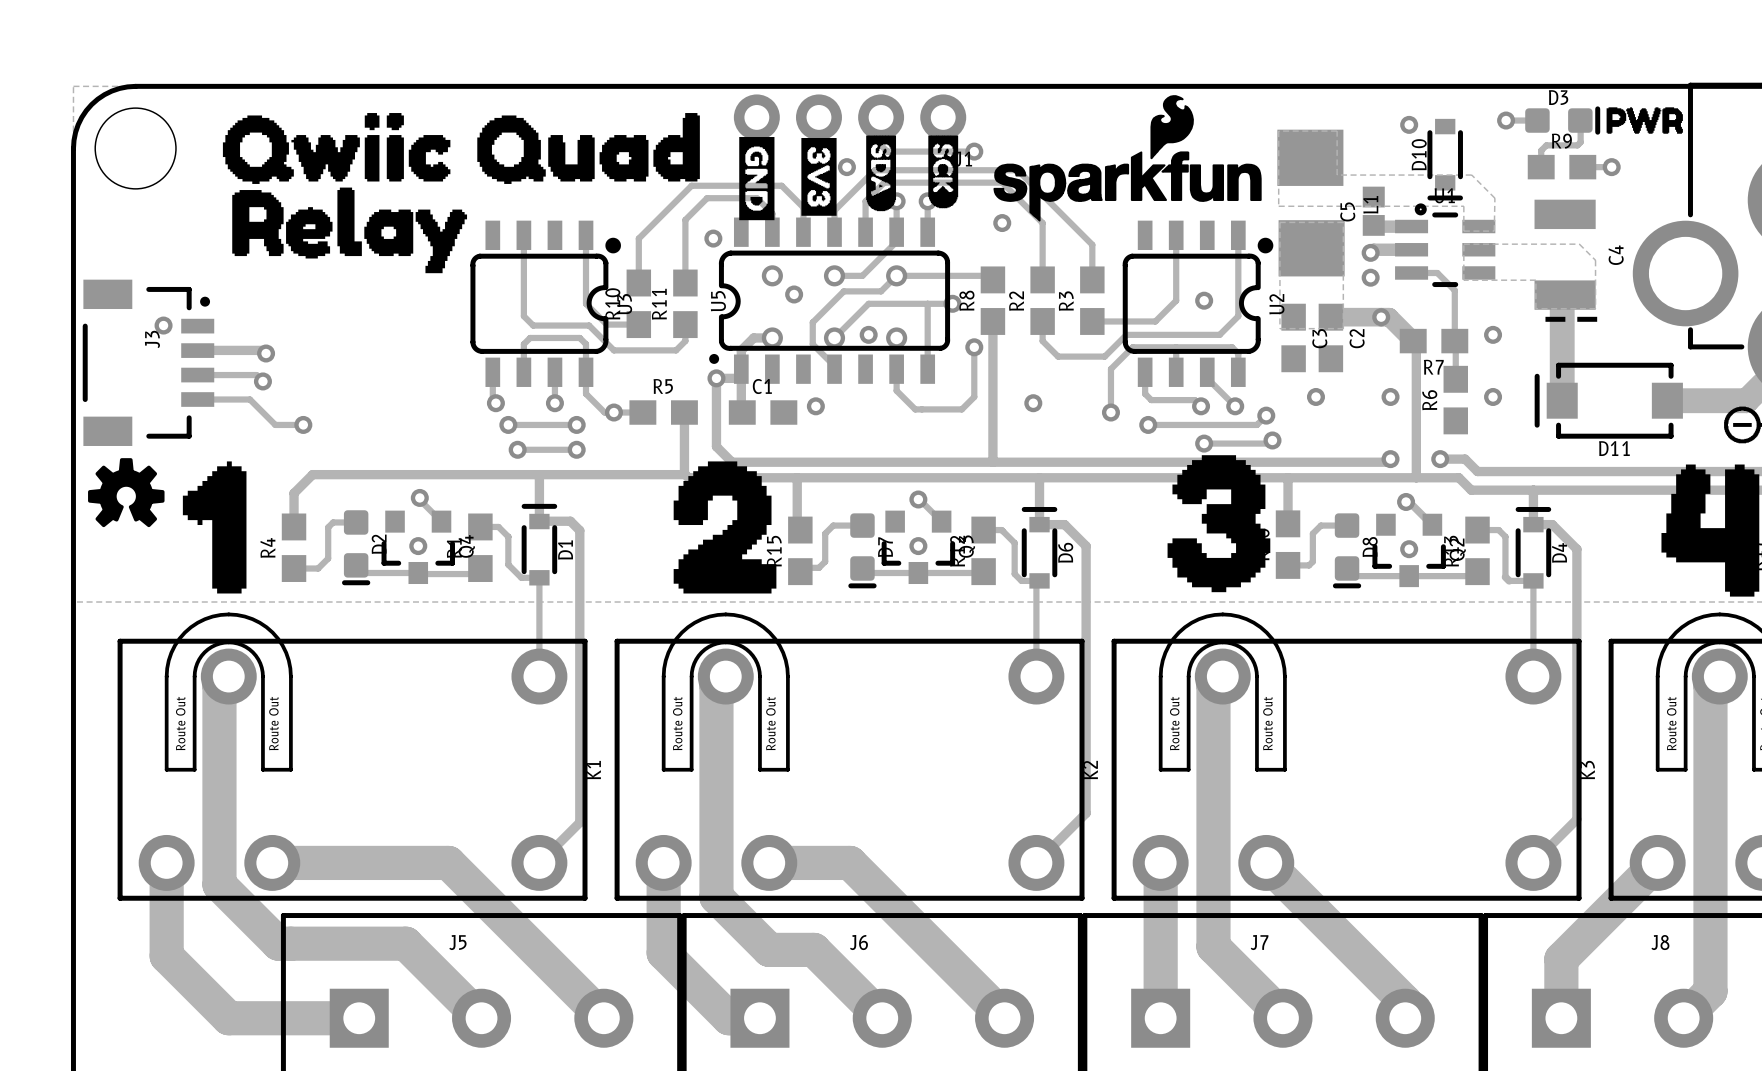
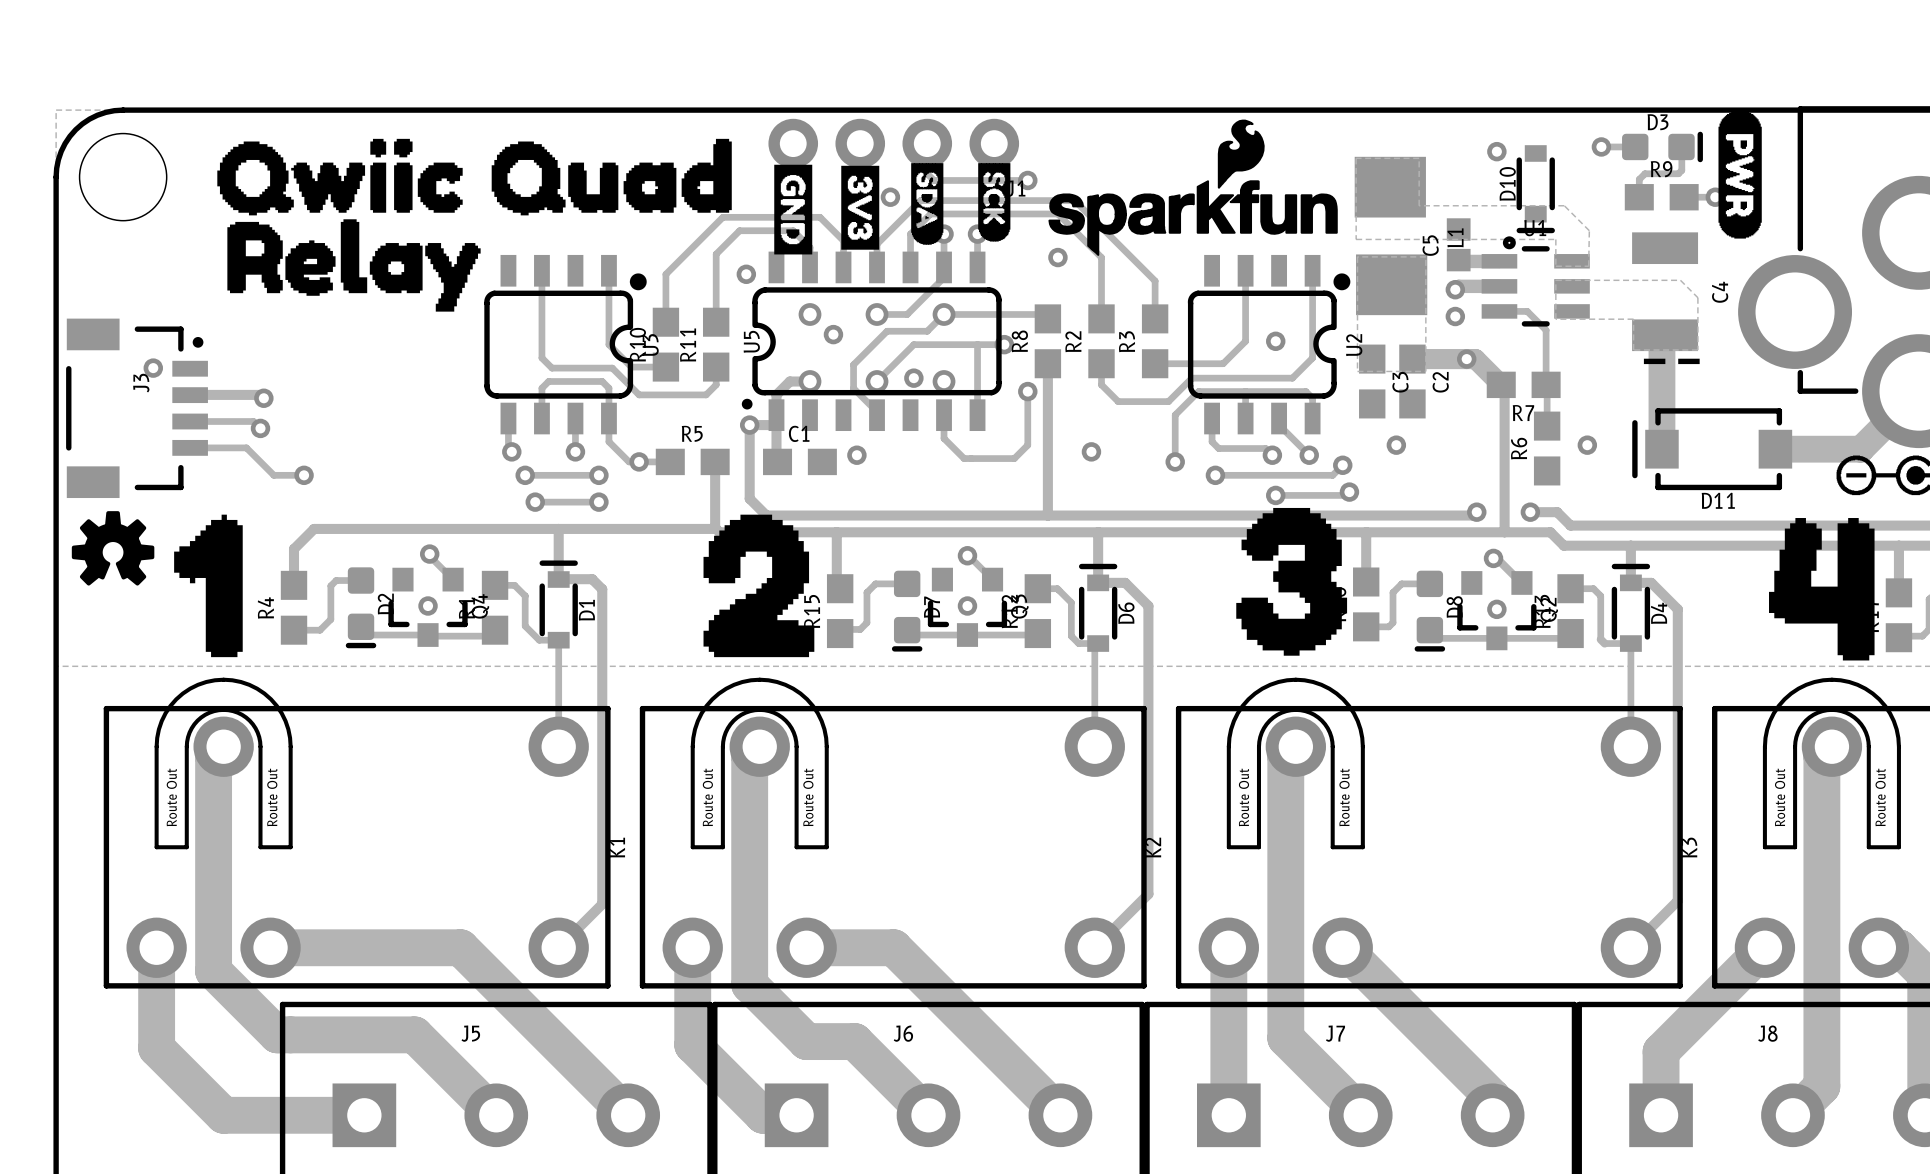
drawing: none -> [1718, 110, 1762, 239]
drawing: [1606, 107, 1683, 134] -> none
via: (1493, 334) -> none
via: (1390, 396) -> none

